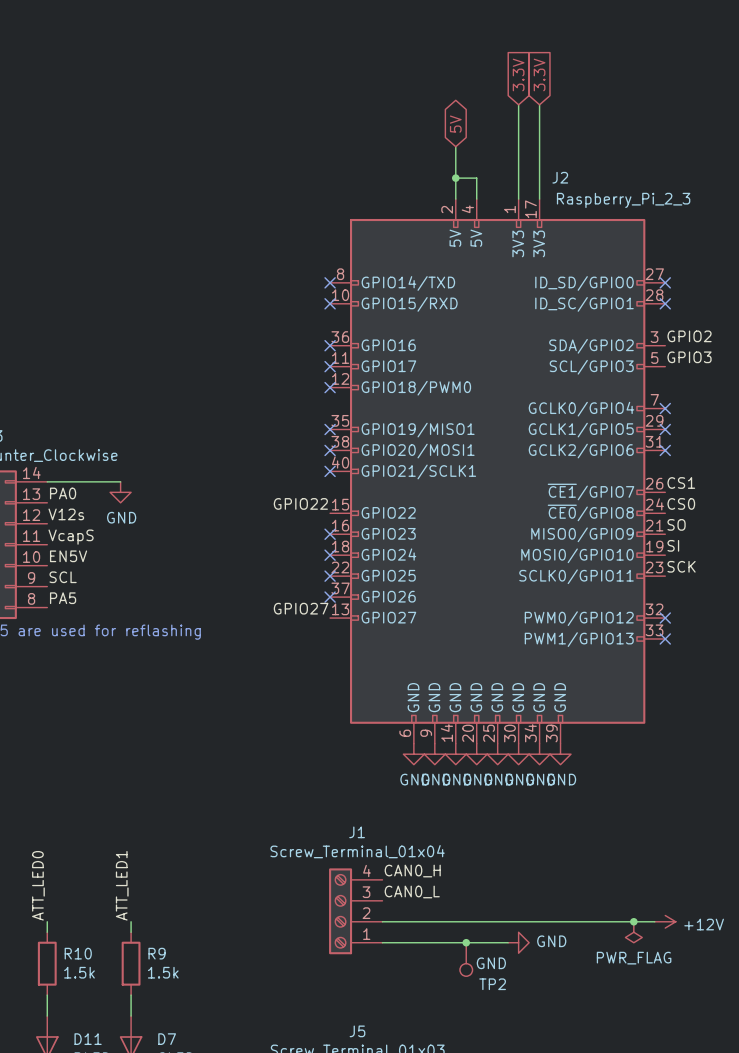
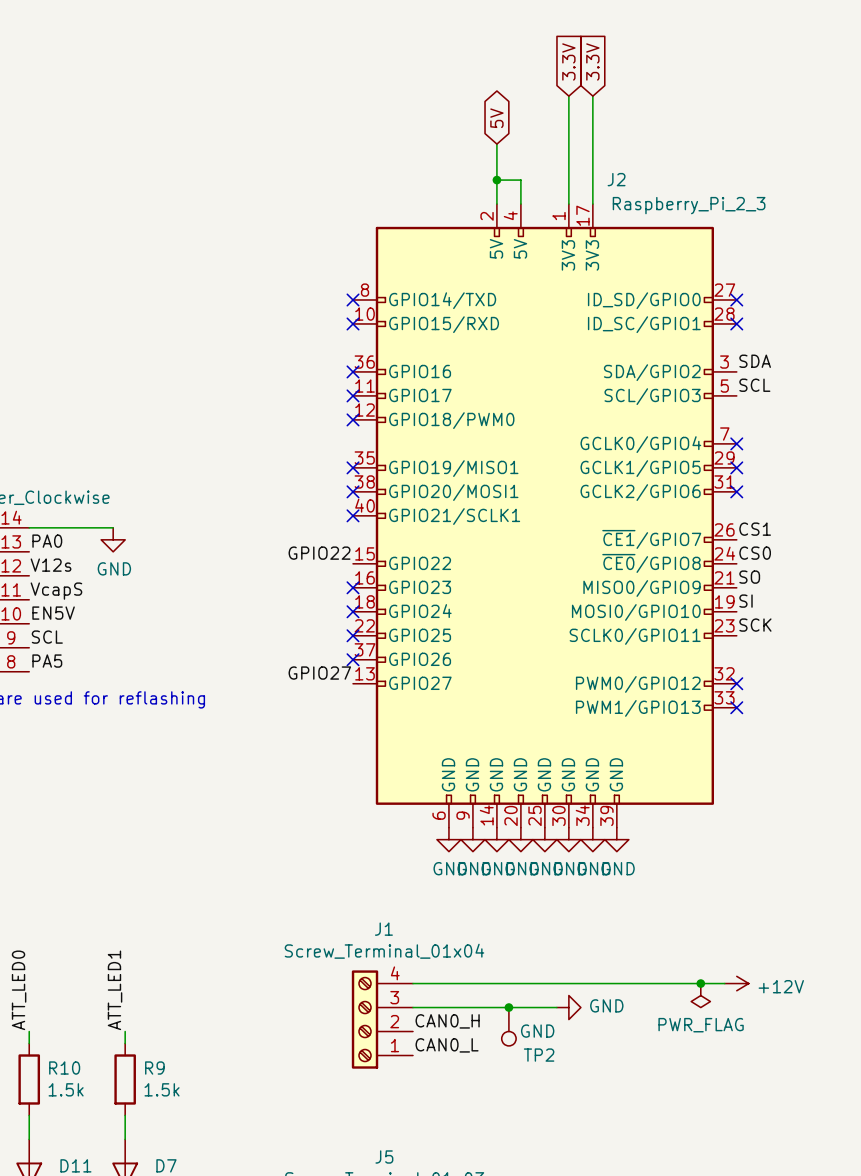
label: GPIO2 (689, 336) -> SDA (755, 361)
label: GPIO3 (689, 357) -> SCL (754, 385)
label position: CAN0_H (412, 871) -> CAN0_H (447, 1021)
label position: CAN0_L (412, 891) -> CAN0_L (447, 1045)
wire: (382, 921) (654, 921) -> (412, 983) (724, 983)
junction position: (633, 921) -> (700, 983)
power symbol position: +12V (665, 921) -> +12V (736, 983)
power symbol position: PWR_FLAG (633, 932) -> PWR_FLAG (700, 995)
wire: (382, 942) (508, 942) -> (412, 1007) (556, 1007)
junction position: (466, 942) -> (508, 1007)
power symbol position: GND (518, 942) -> GND (568, 1007)
TP2 position: (466, 959) -> (508, 1026)

